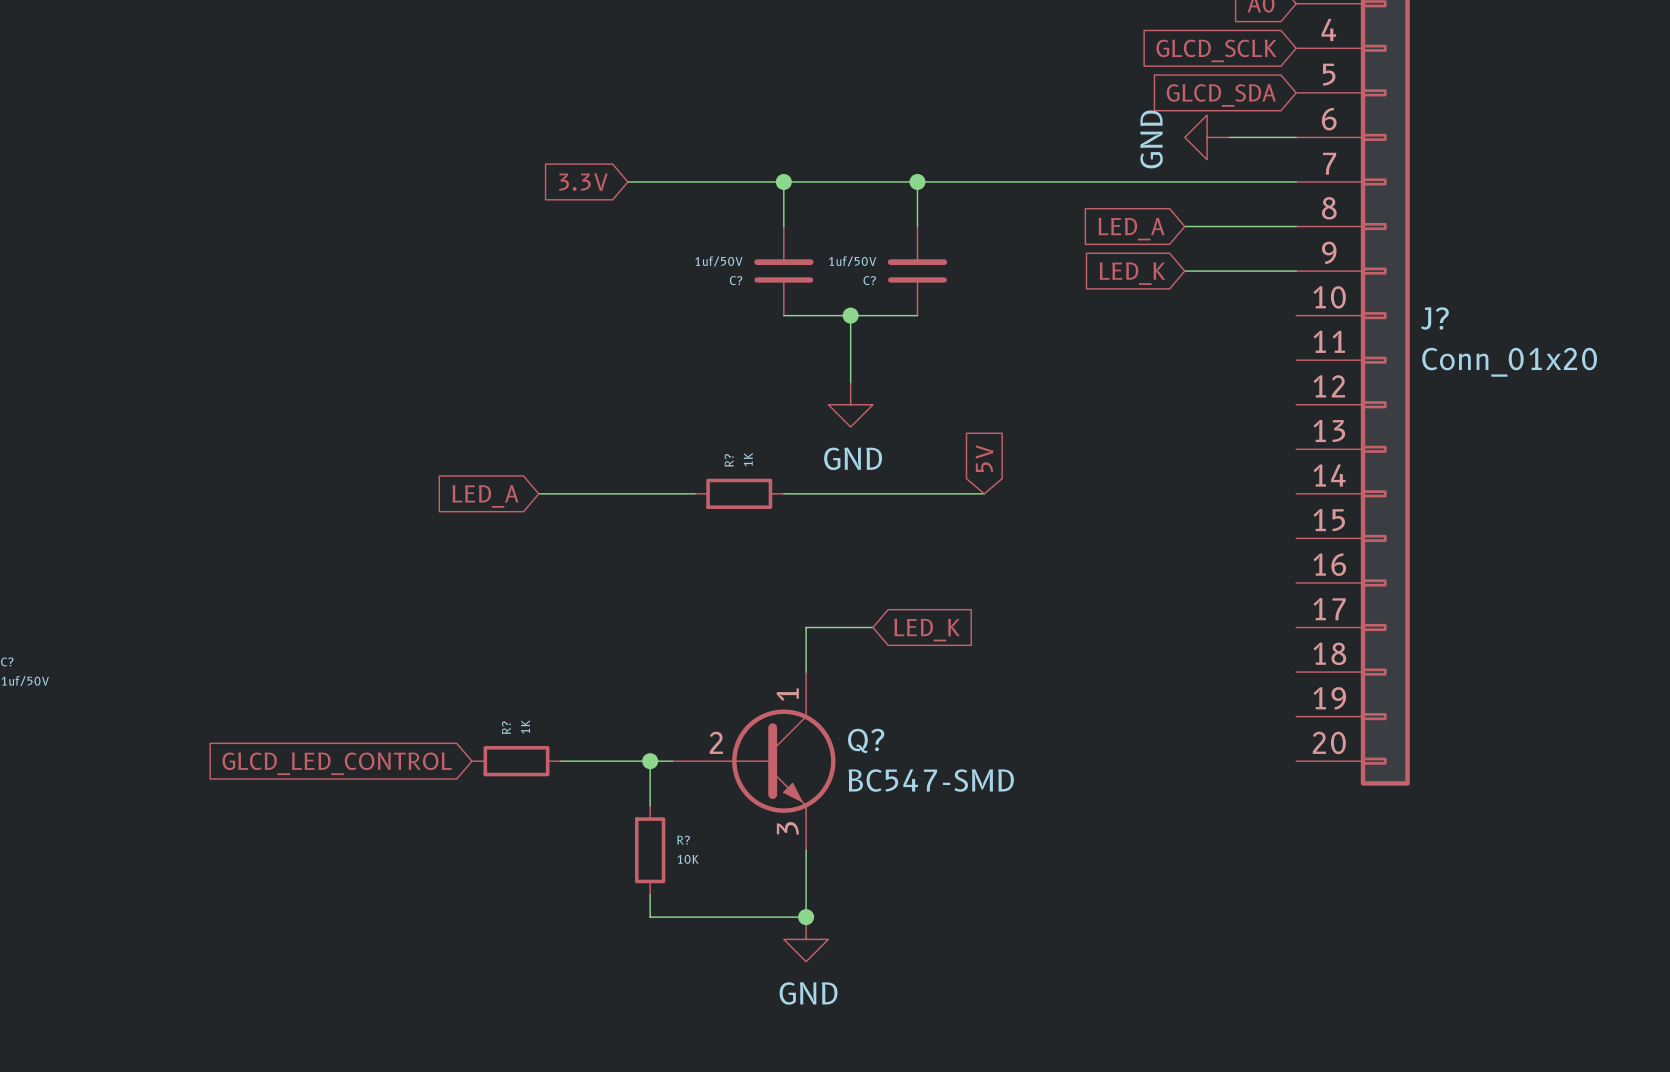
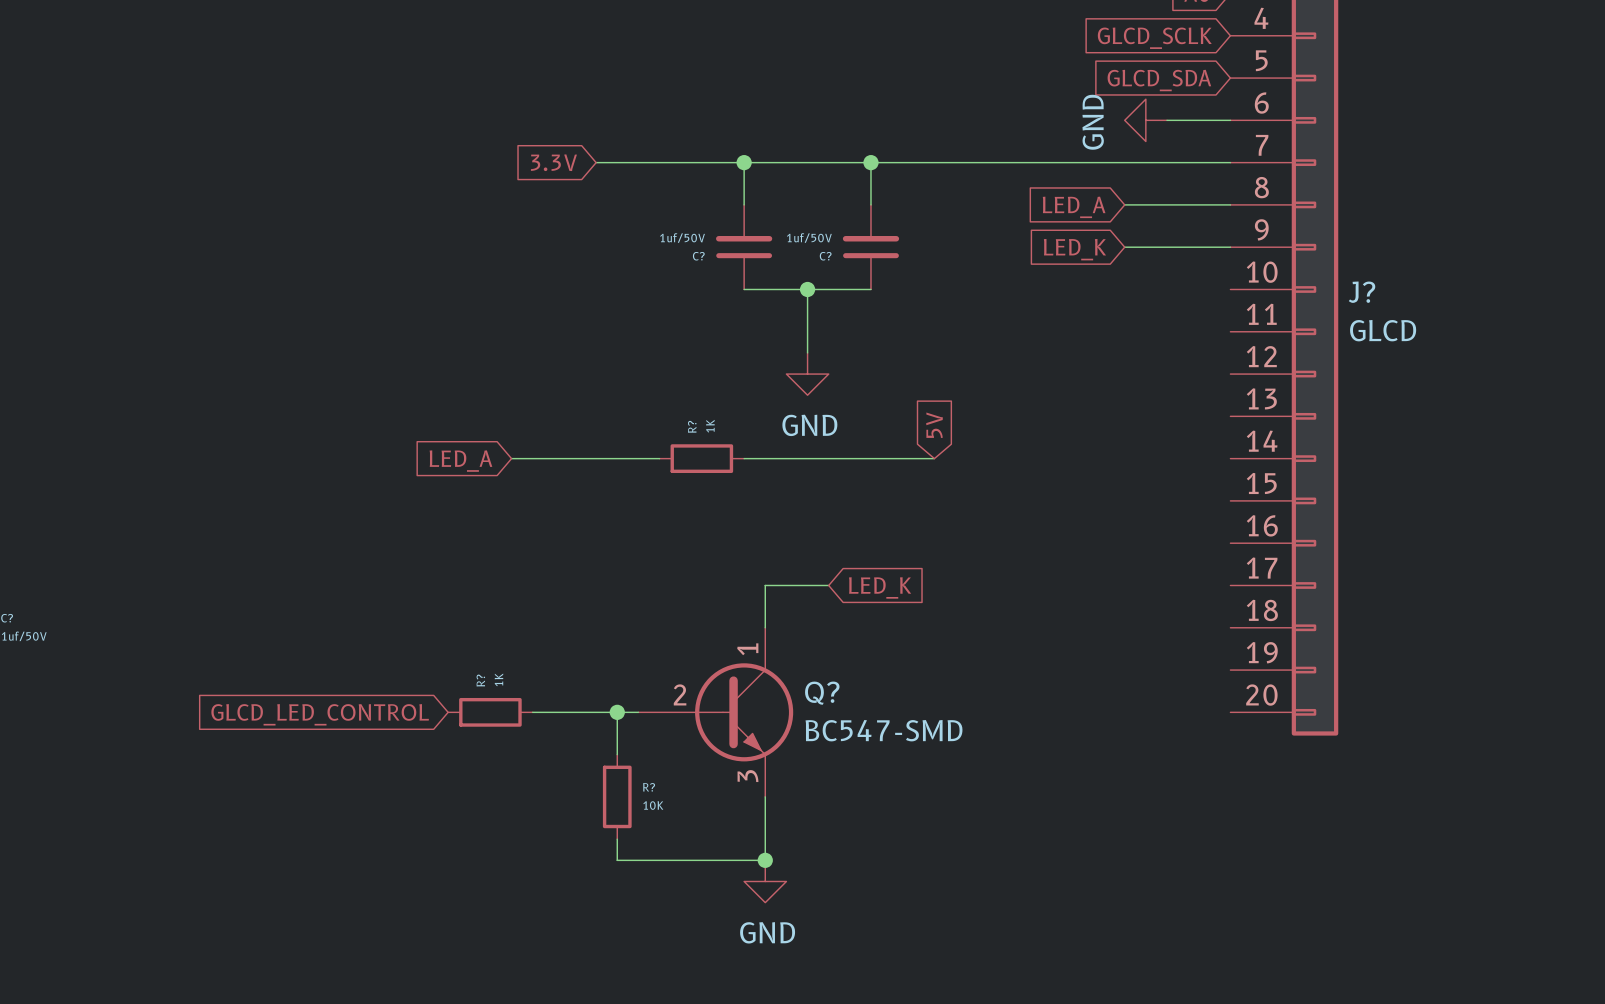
J? value: Conn_01x20 (1509, 362) -> GLCD (1383, 330)

